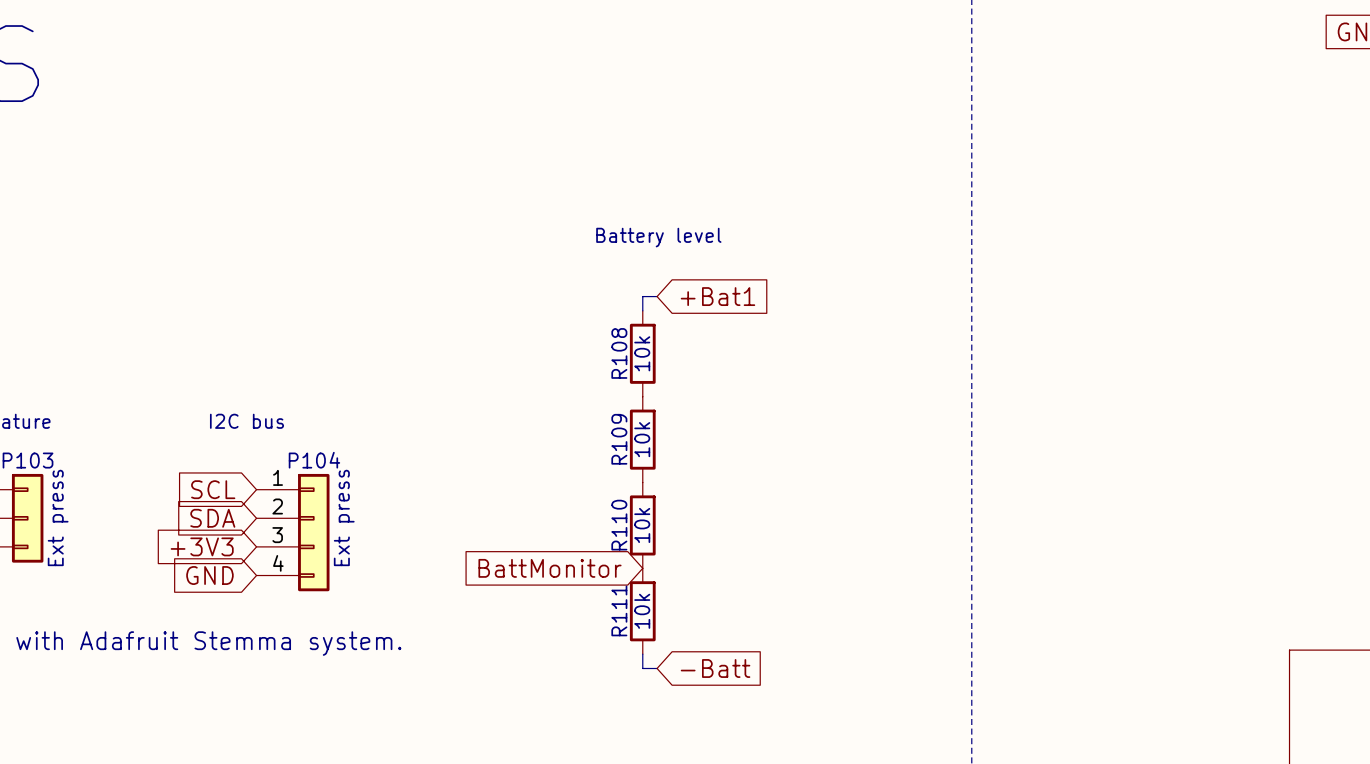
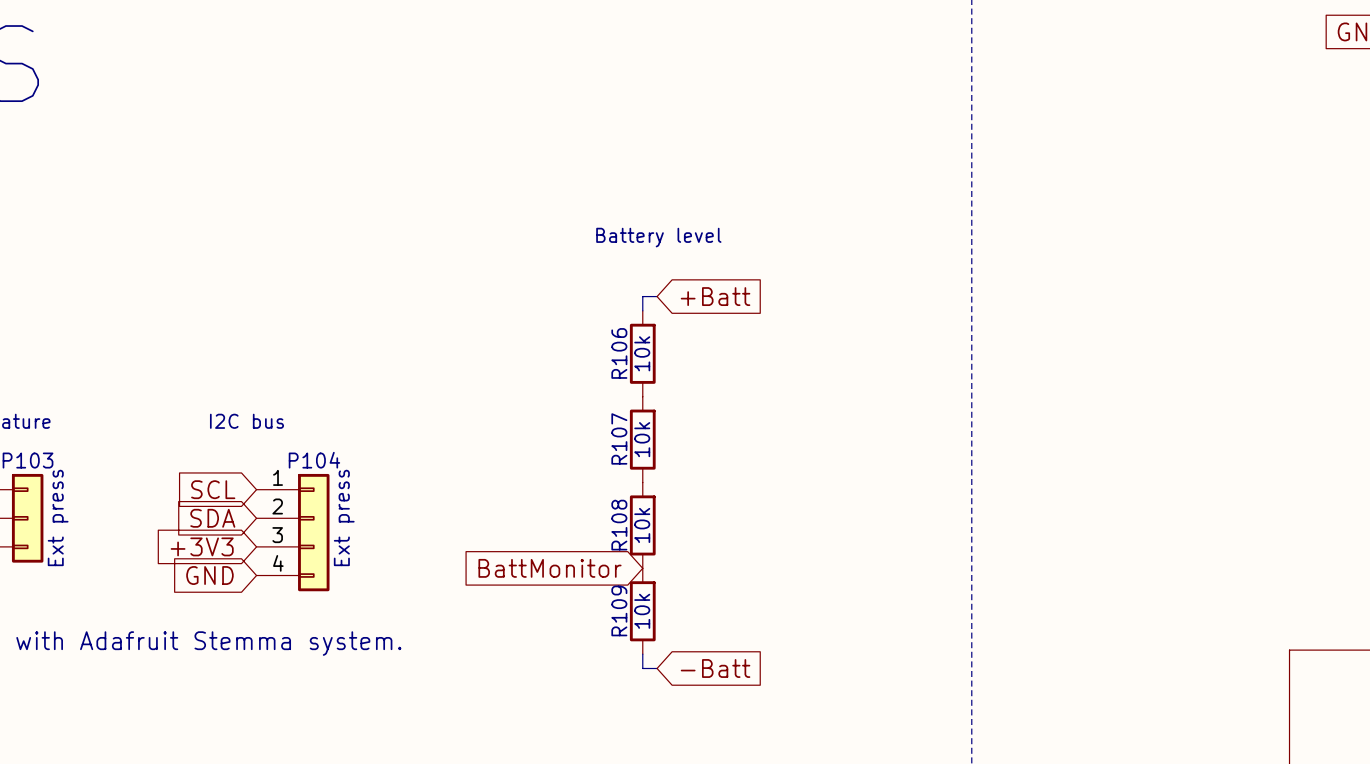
global label: +Bat1 (717, 296) -> +Batt (715, 296)
R108 name: R108 (619, 353) -> R106 (619, 353)
R109 name: R109 (619, 439) -> R107 (619, 438)
R110 name: R110 (619, 525) -> R108 (619, 525)
R111 name: R111 (619, 610) -> R109 (619, 610)

